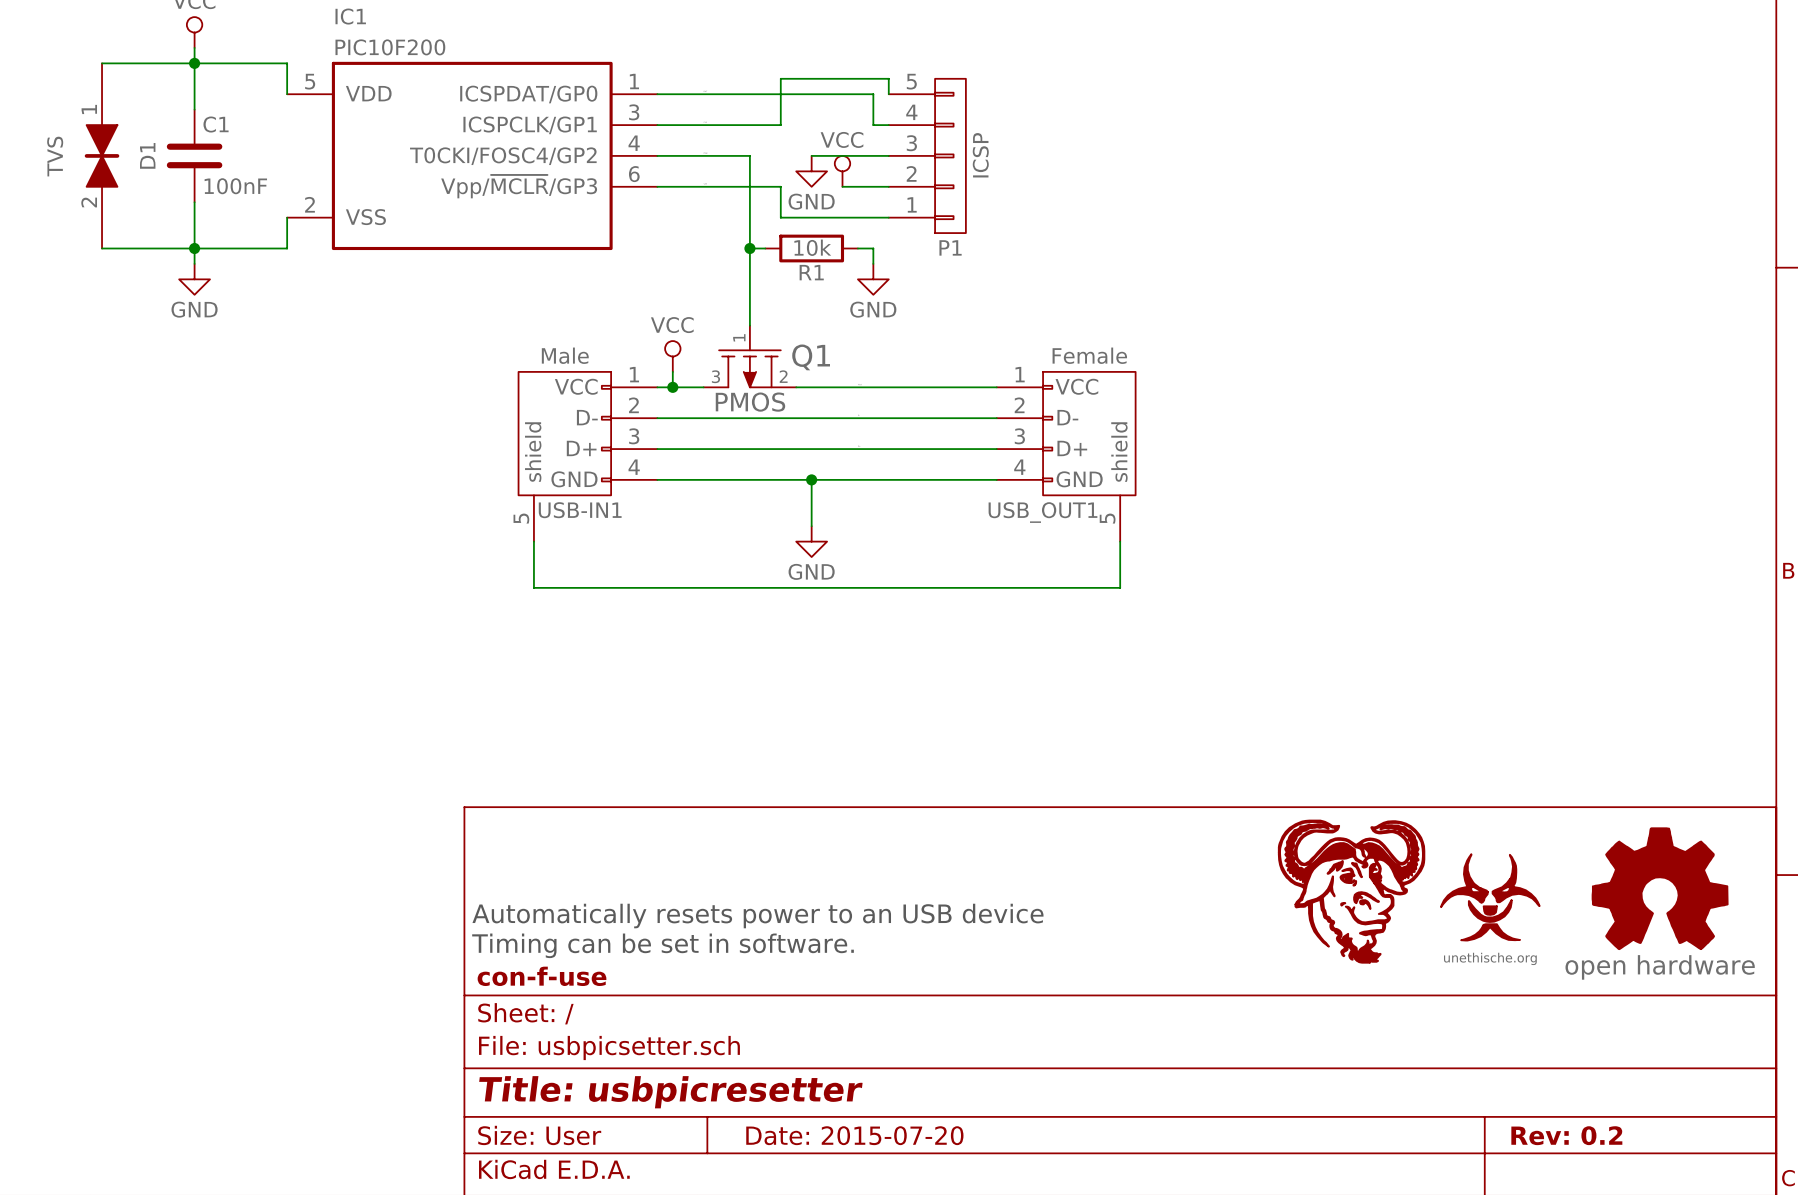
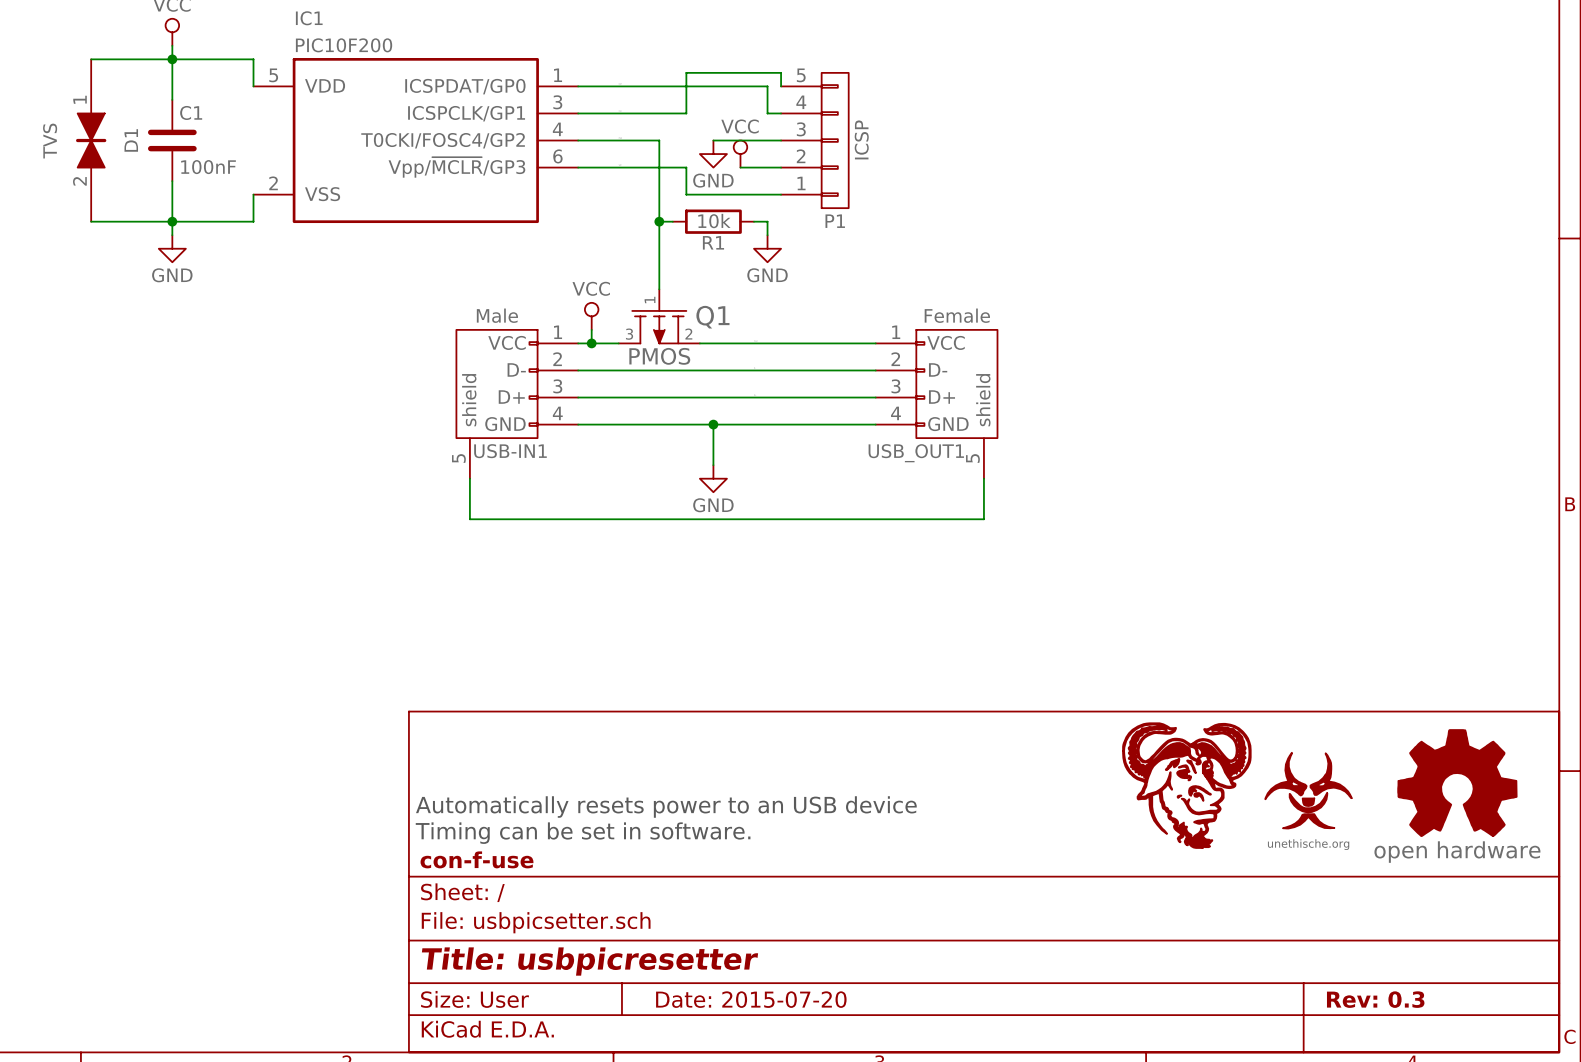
title block: Rev: 0.2 (1566, 1135) -> Rev: 0.3 (1375, 999)

